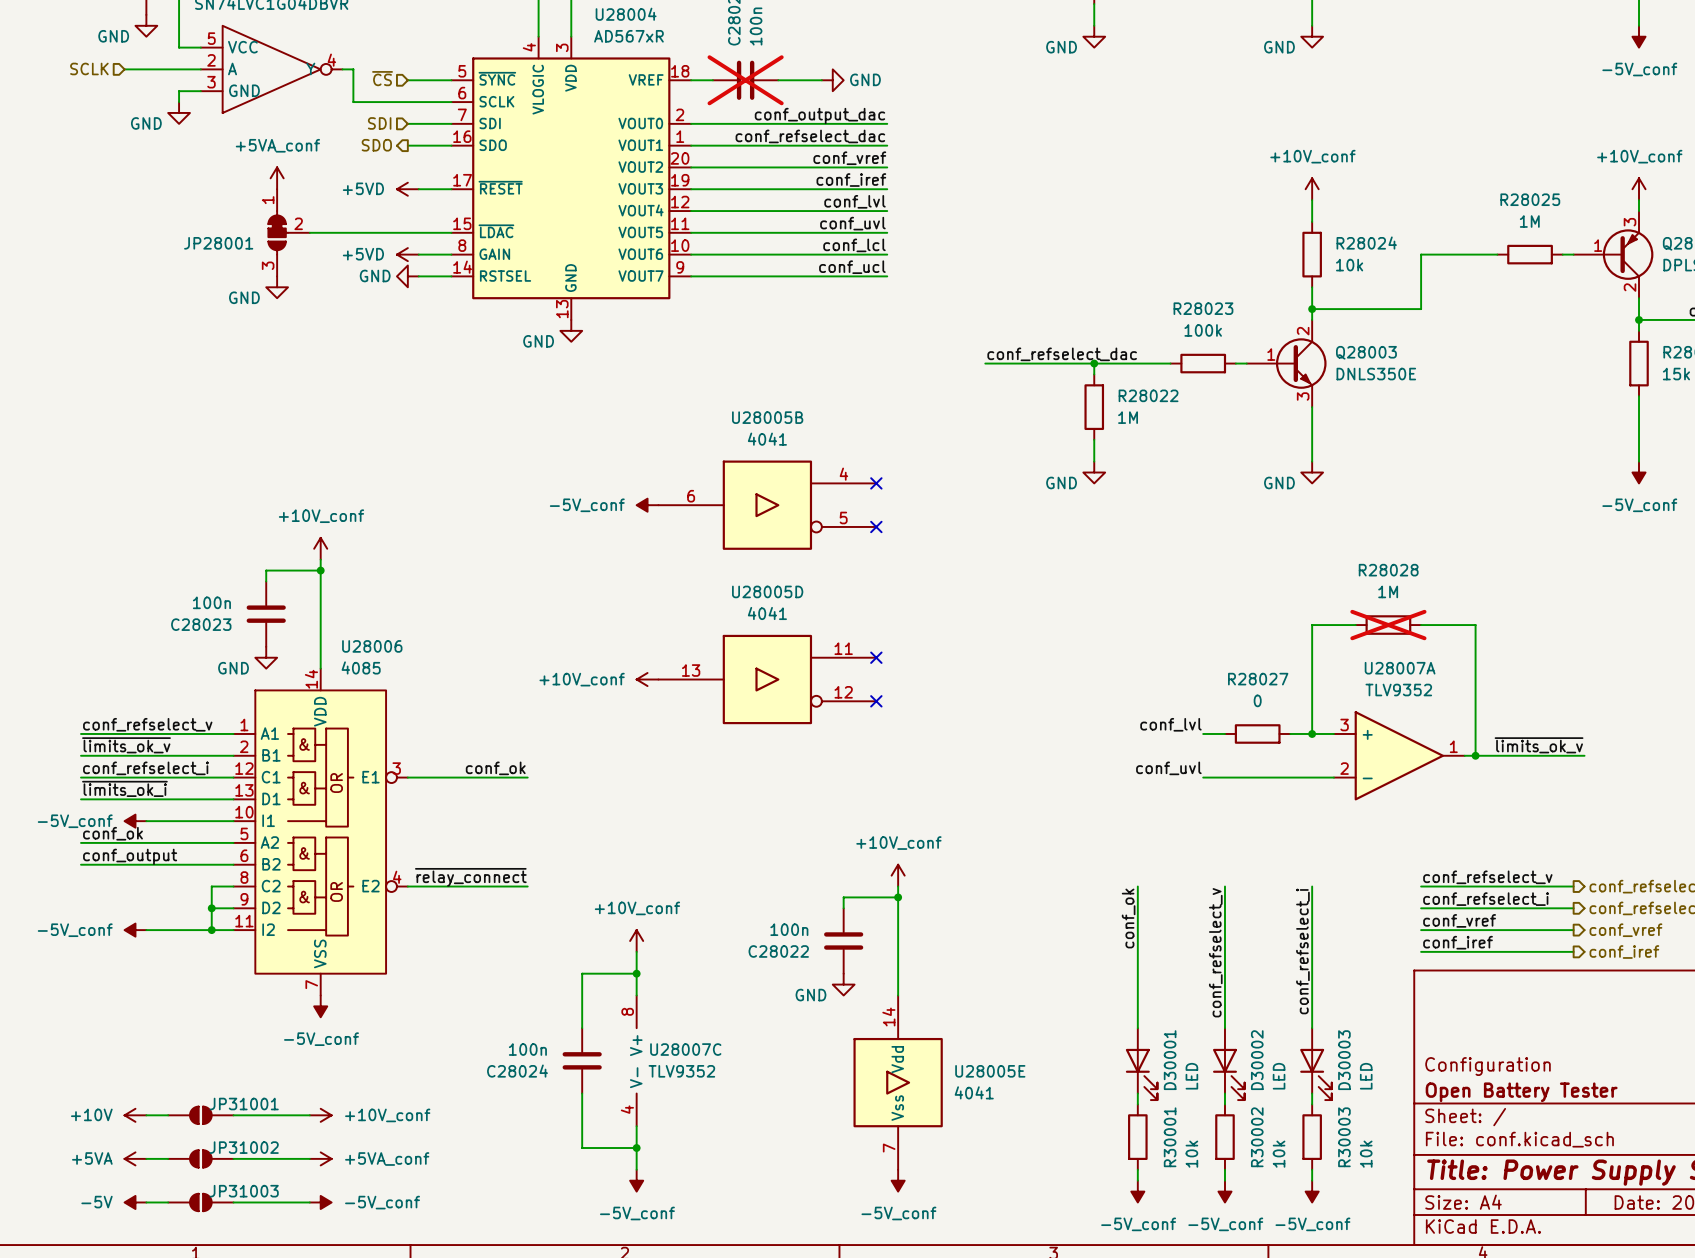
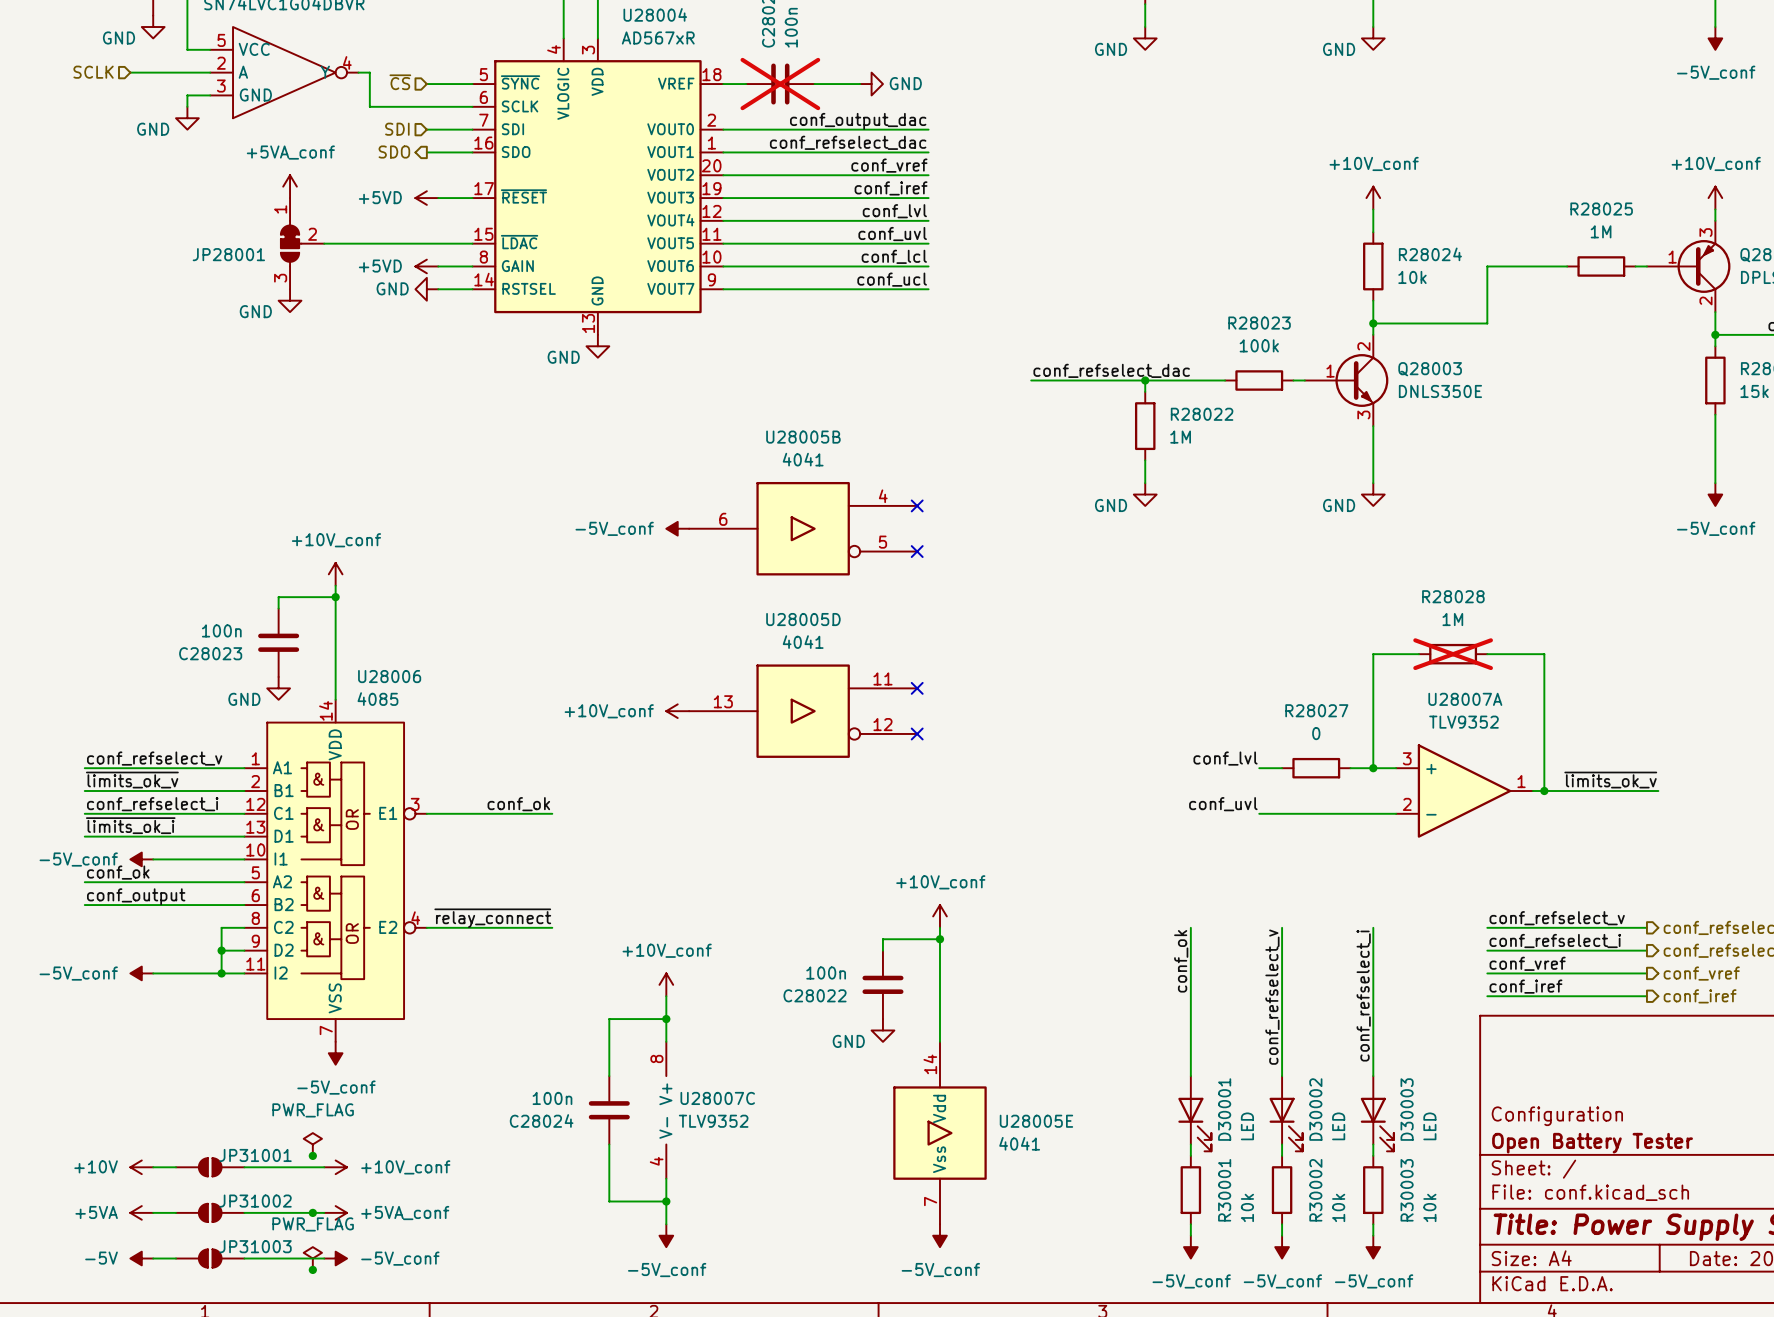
power symbol: none -> PWR_FLAG (312, 1144)
junction: none -> (312, 1155)
junction: none -> (312, 1212)
power symbol: none -> PWR_FLAG (312, 1258)
junction: none -> (312, 1269)

